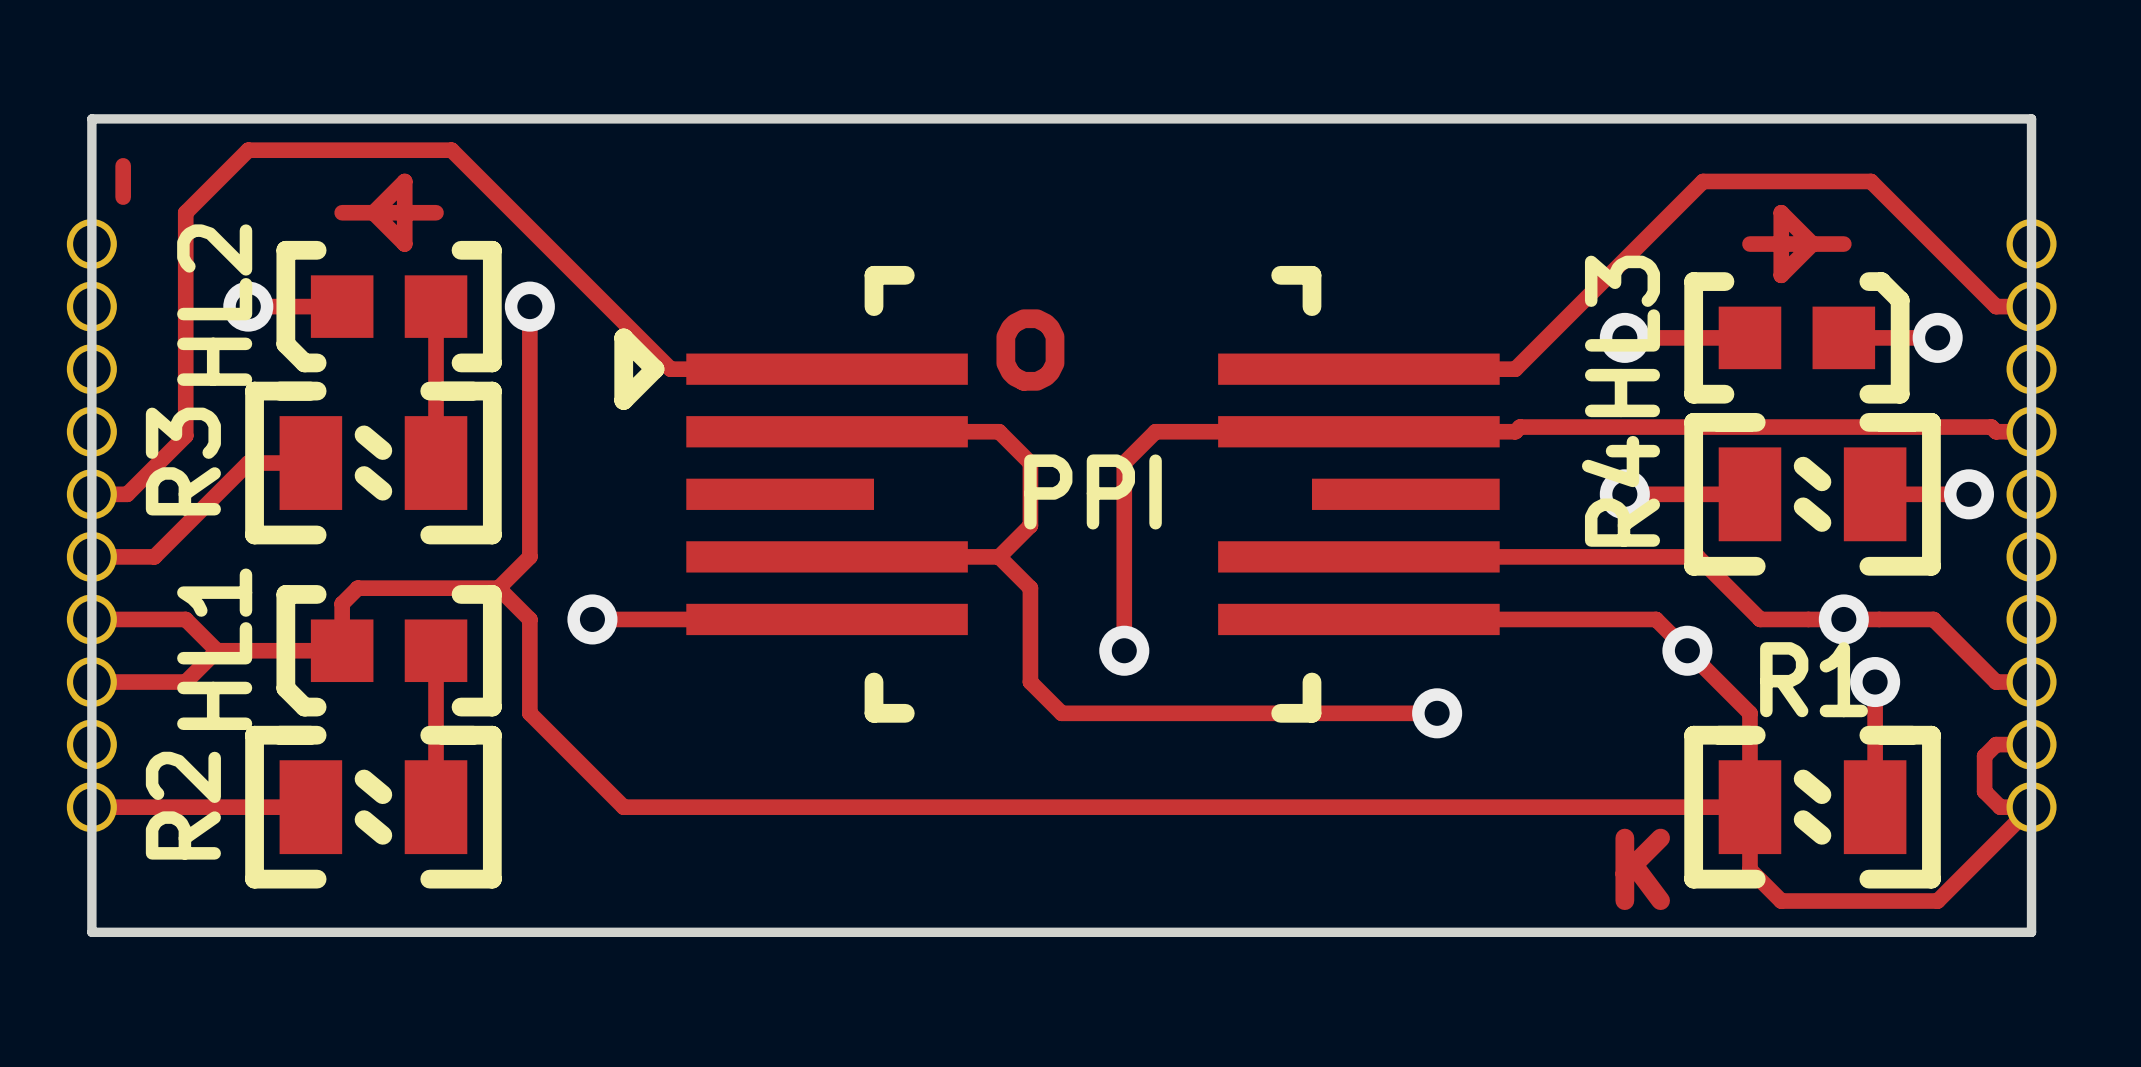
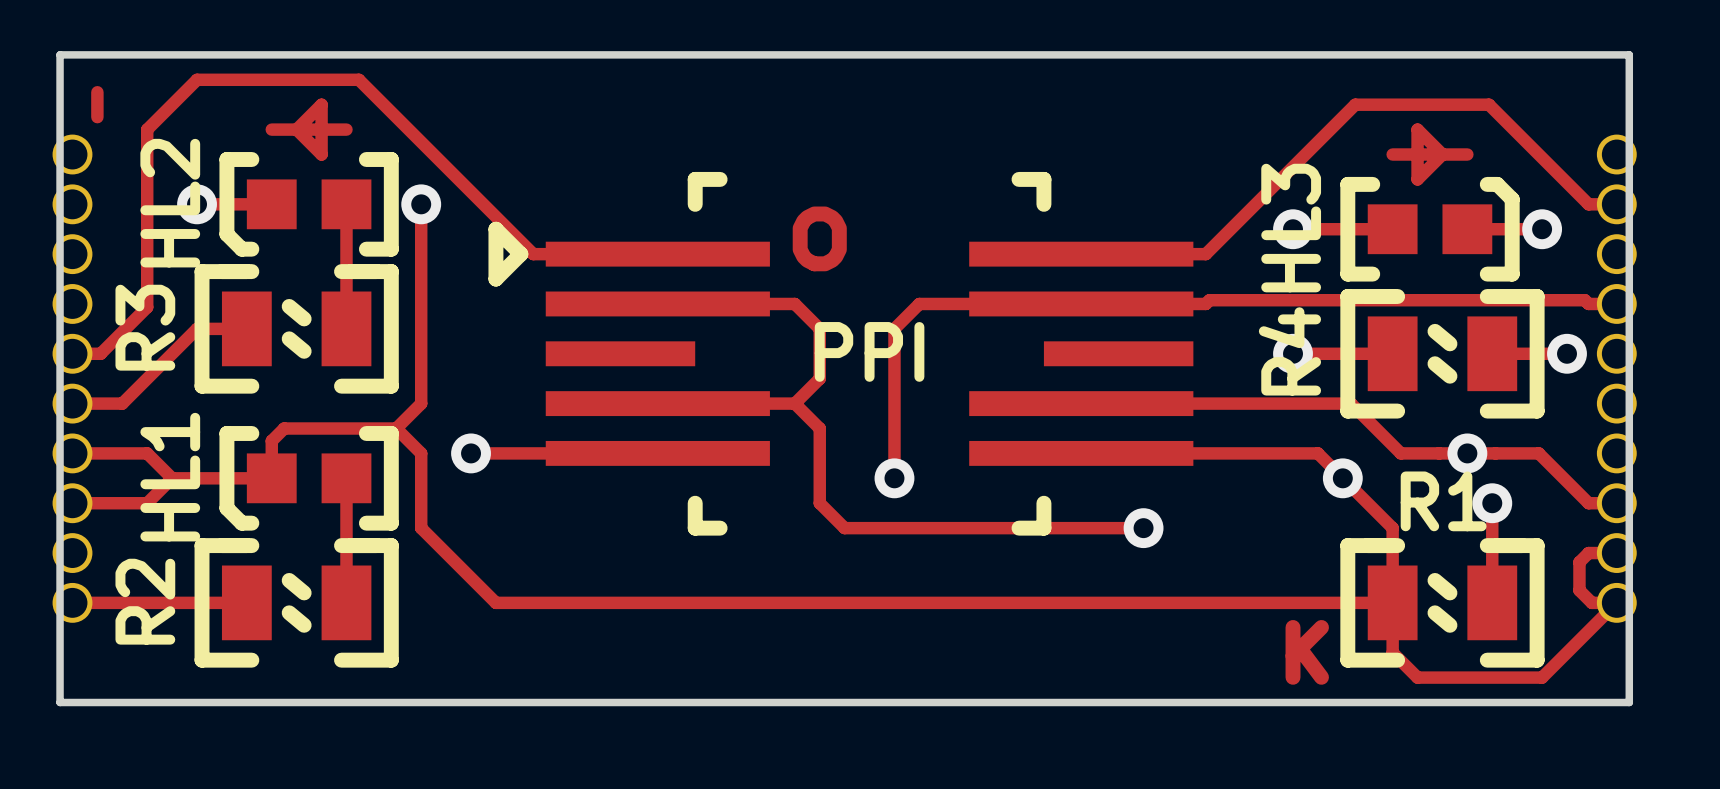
board edge: (91, 118) (91, 932) -> (72, 54) (60, 54) (60, 702) (72, 702)
board edge: (2031, 118) (2031, 932) -> (1616, 54) (1629, 54) (1629, 702) (1616, 702)

